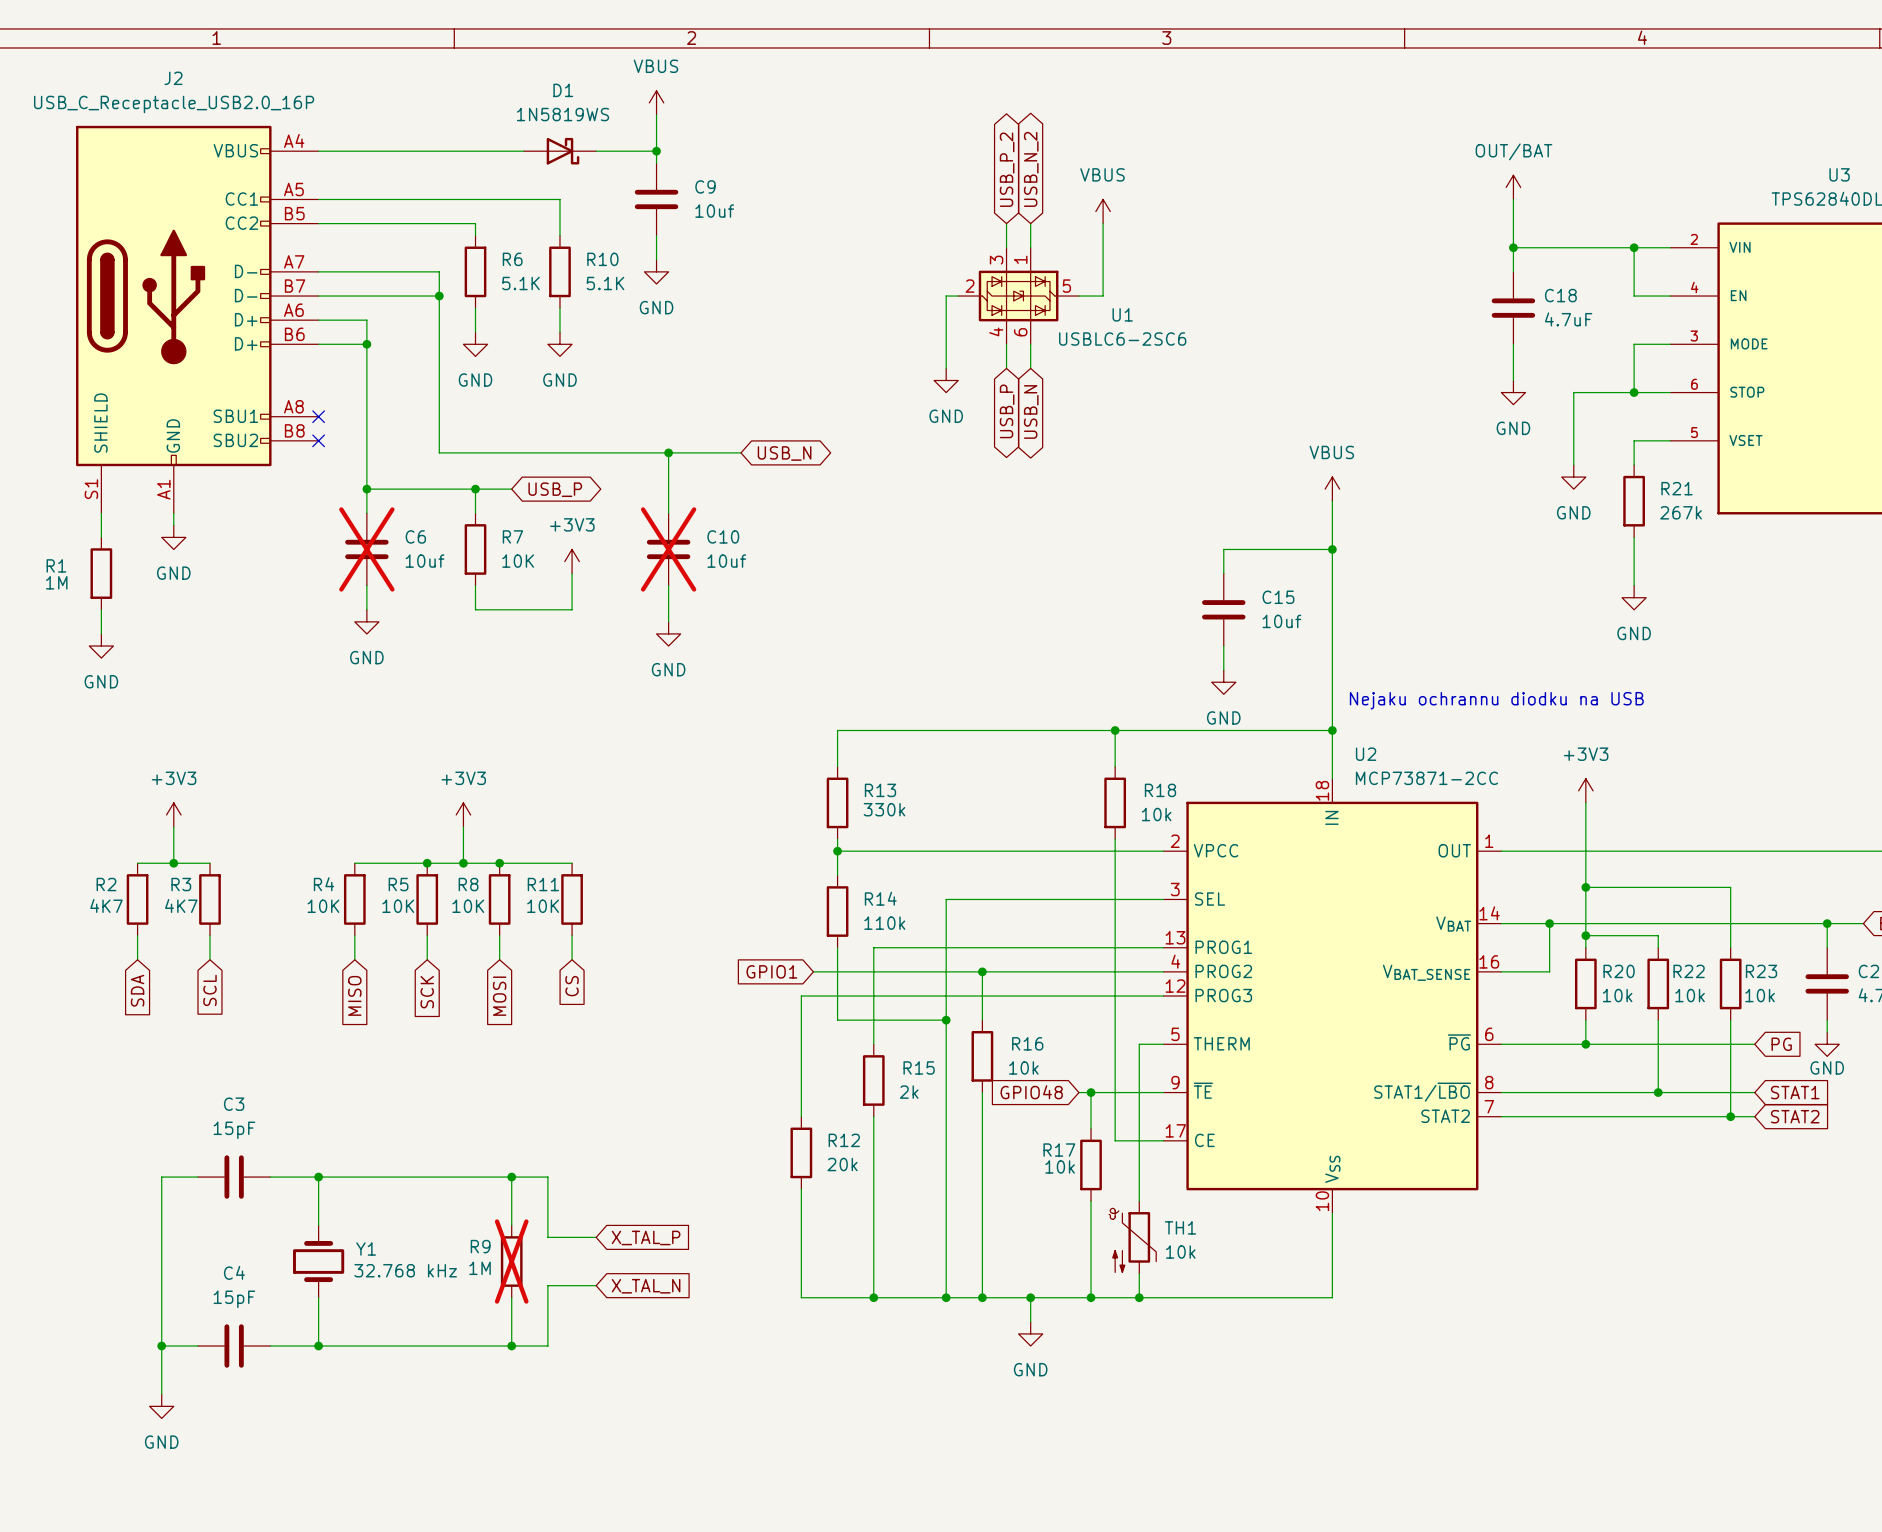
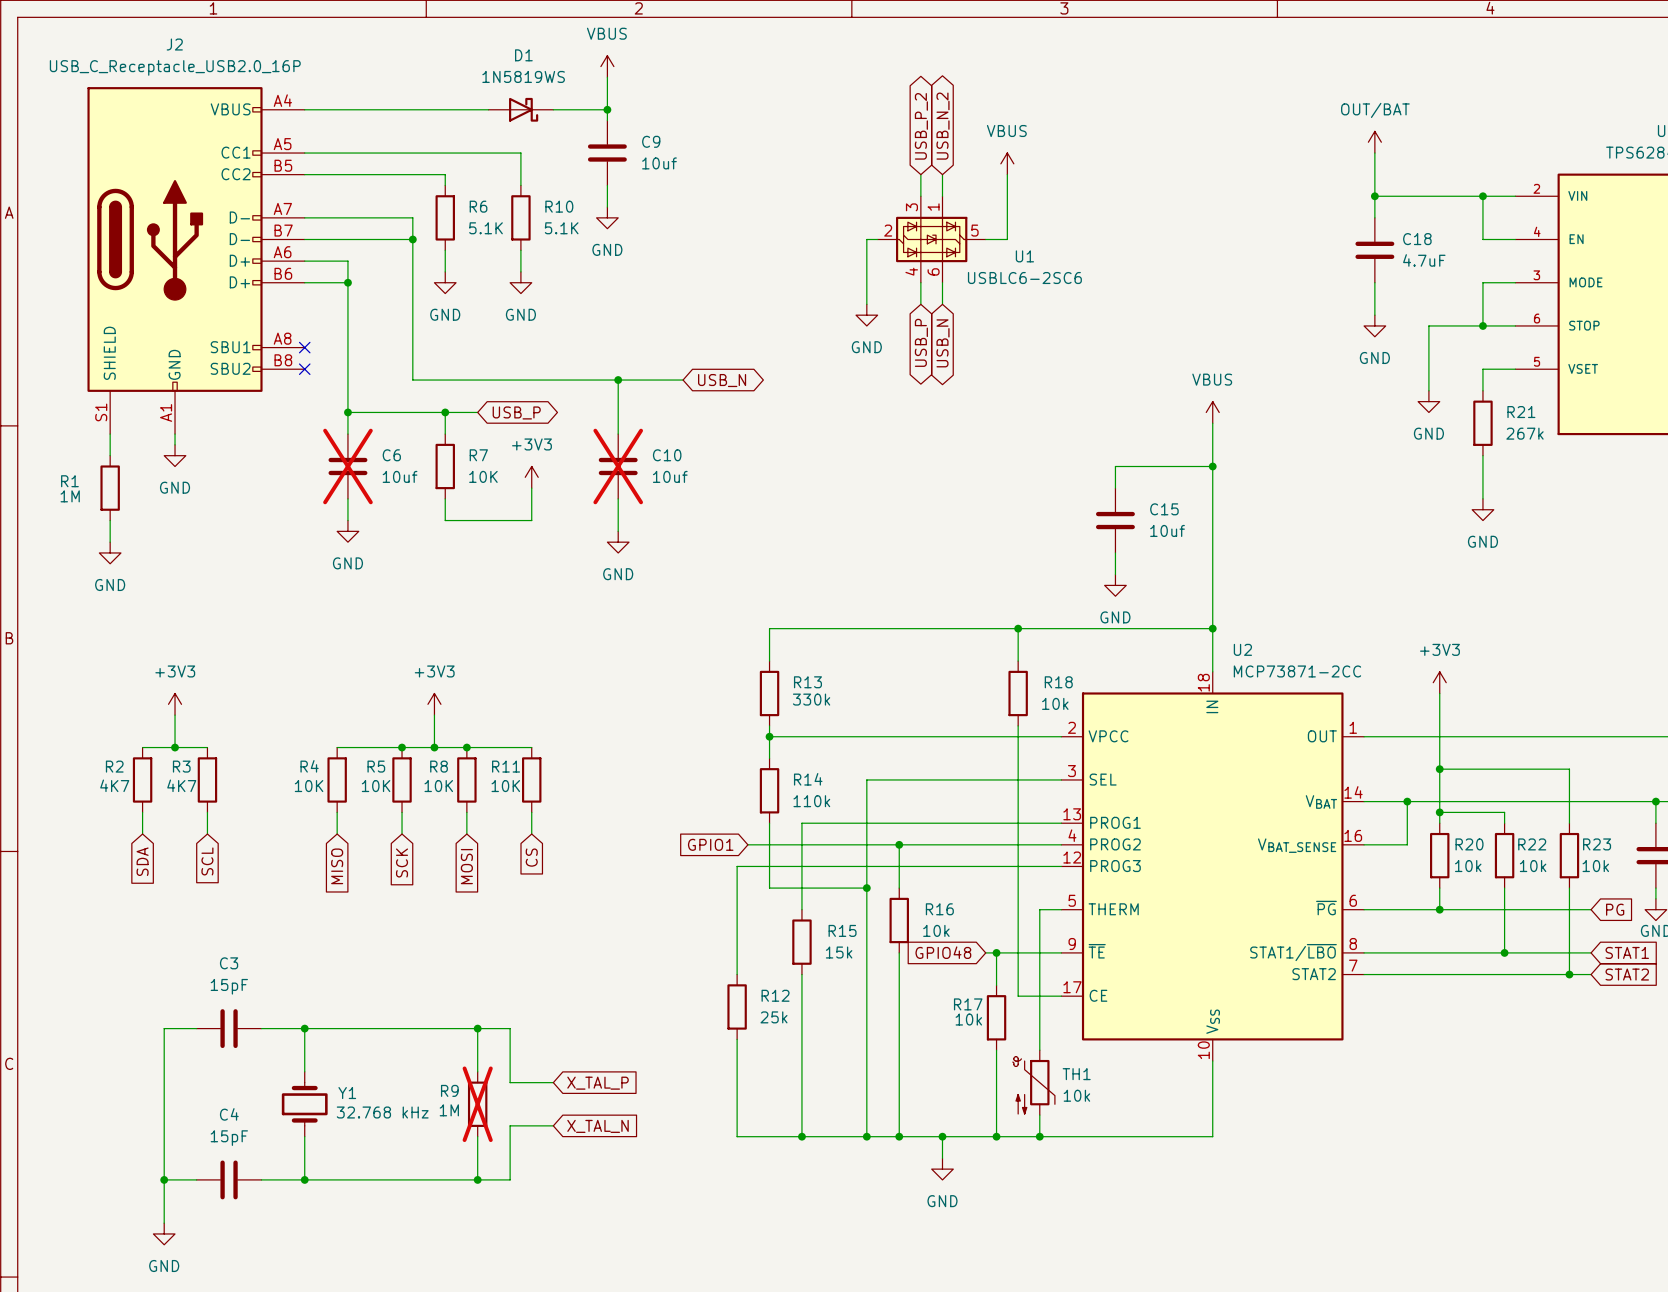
text: Nejaku ochrannu diodku na USB (1496, 700) -> none
R15 value: 2k (909, 1092) -> 15k (839, 952)
R12 value: 20k (842, 1164) -> 25k (773, 1017)

